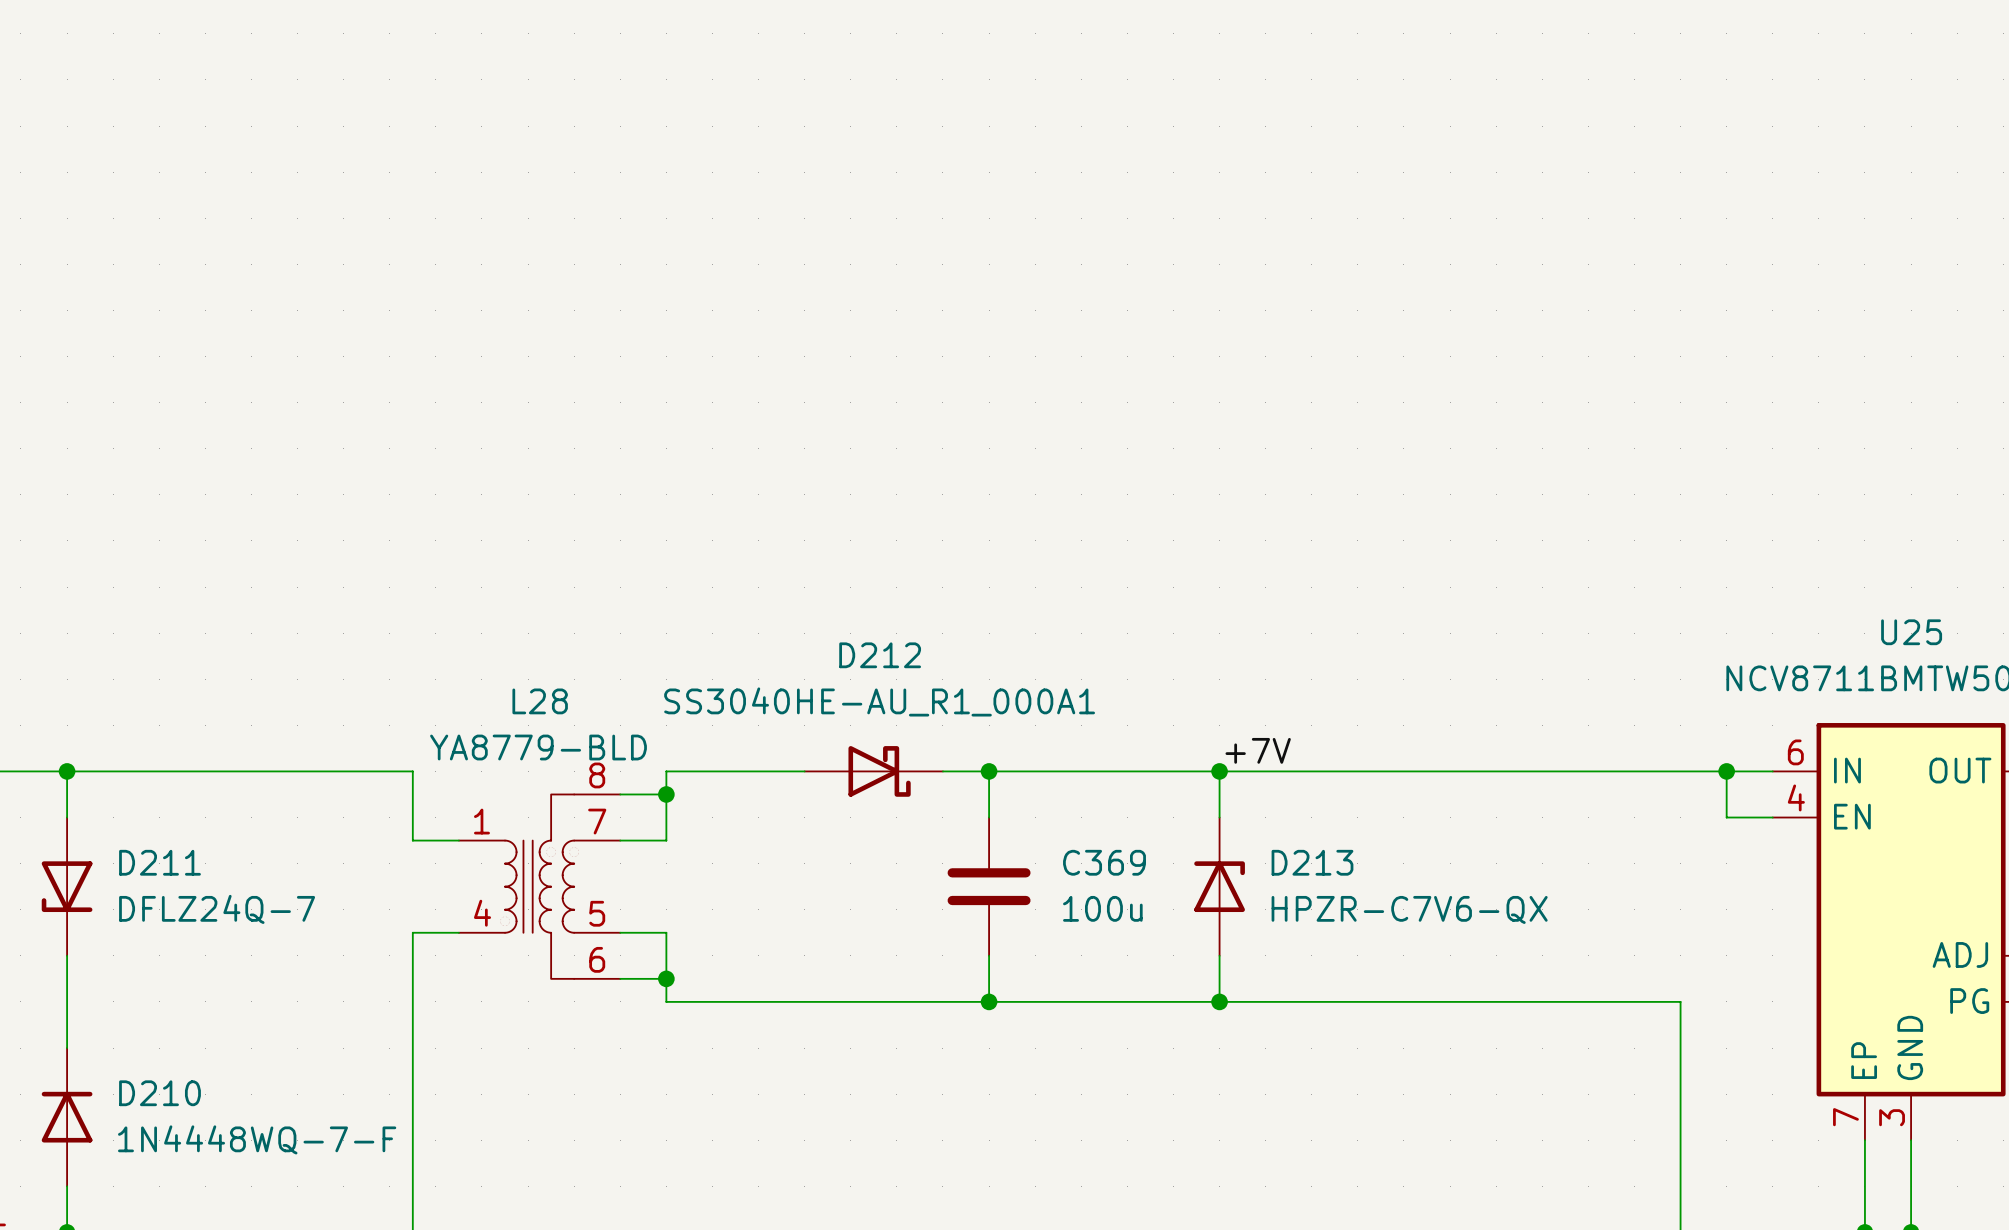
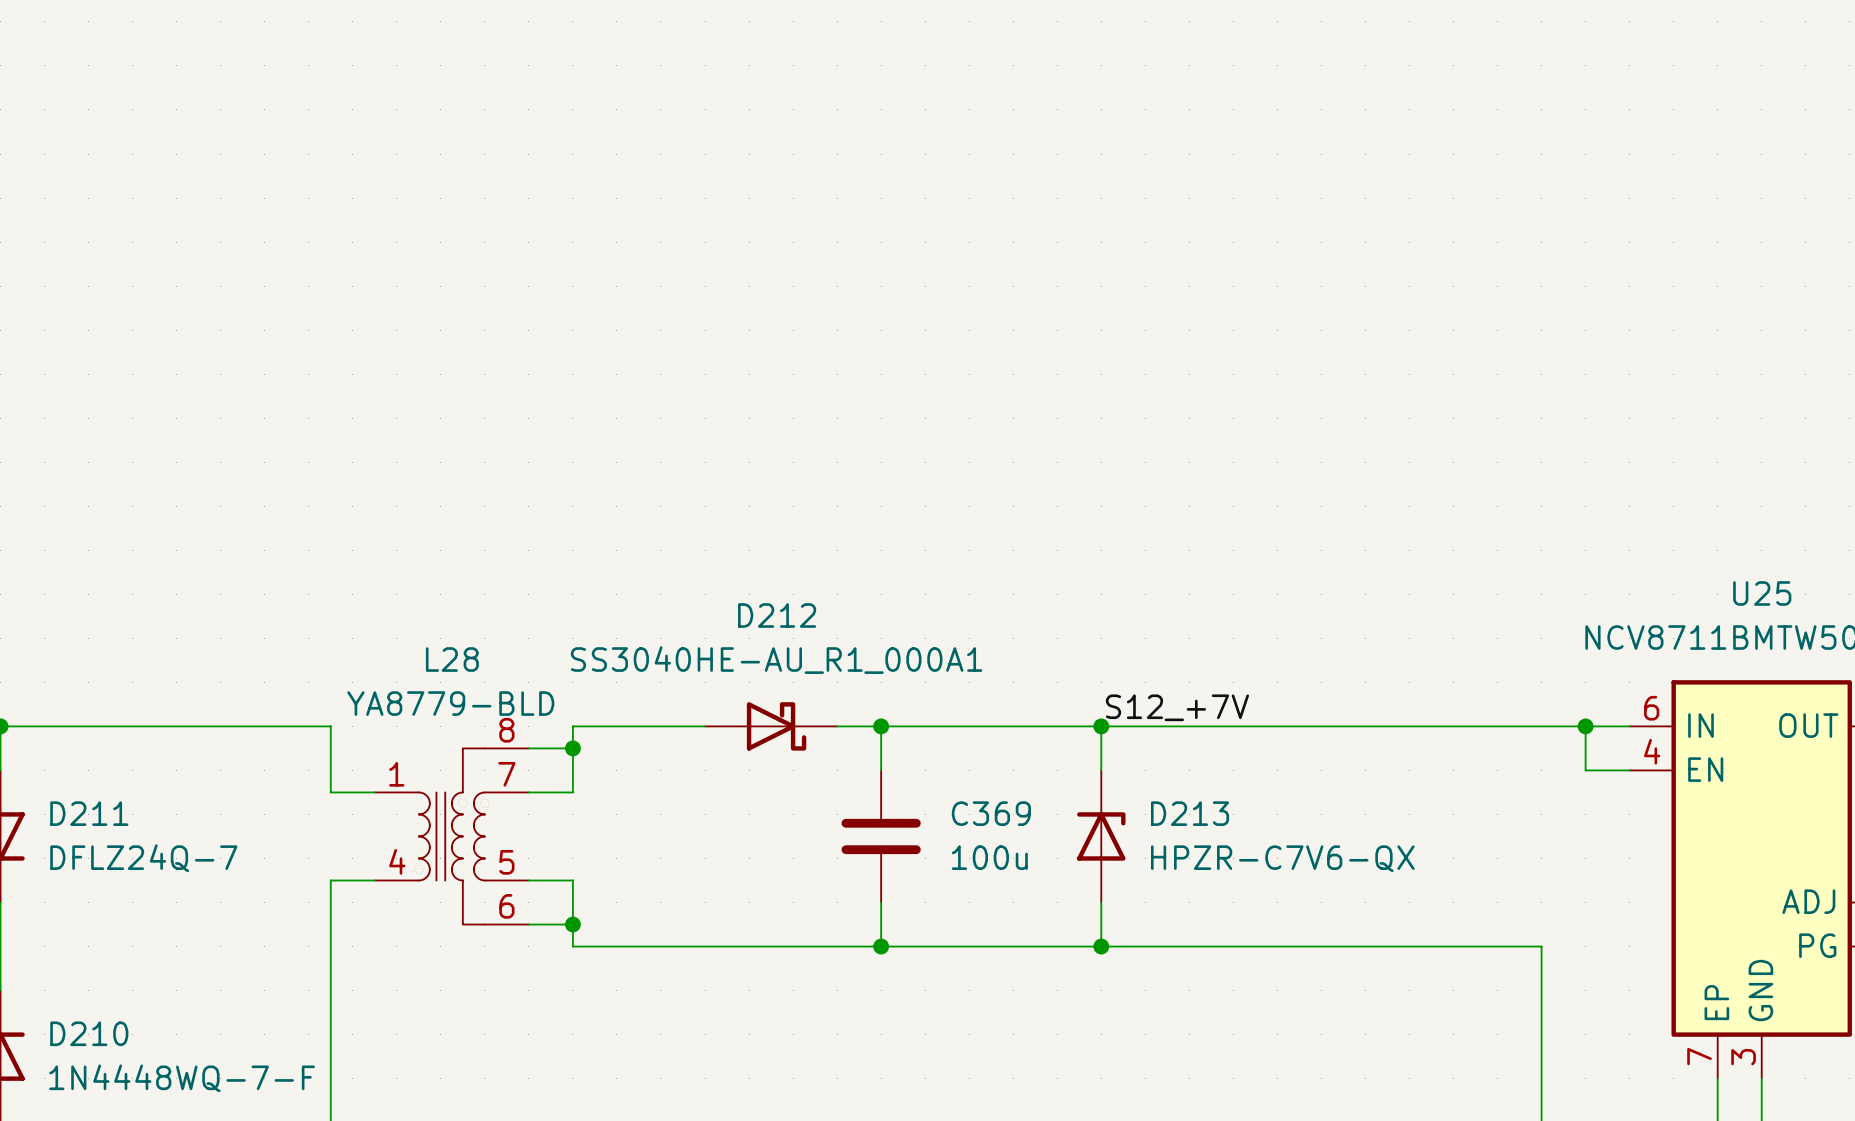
label: +7V (1258, 750) -> S12_+7V (1177, 707)

